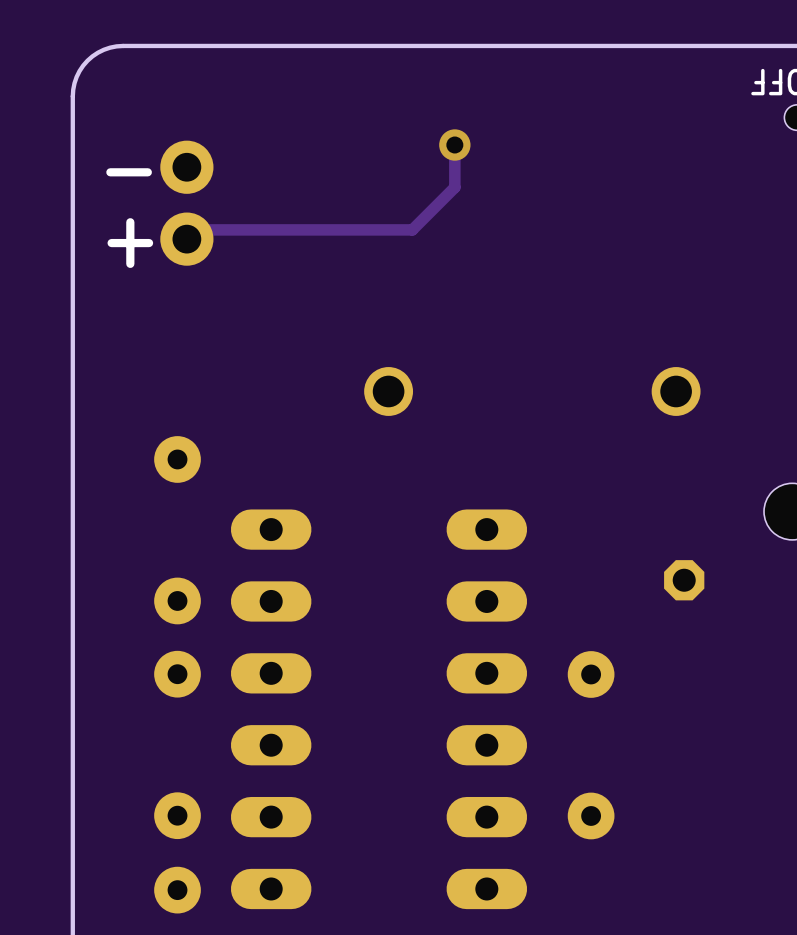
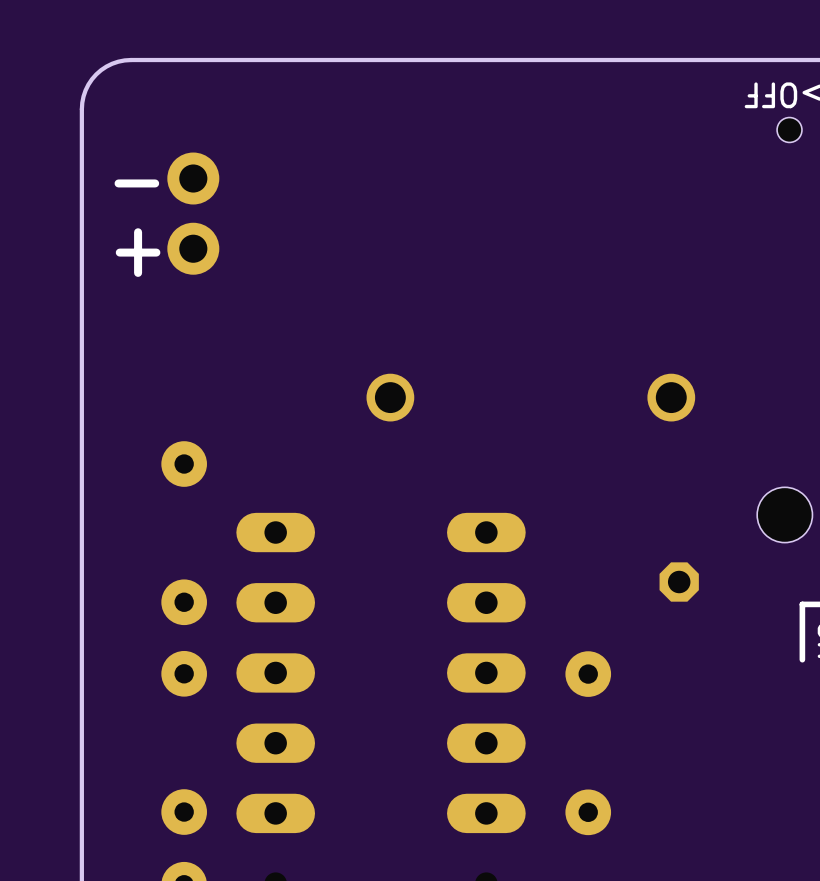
track: (454, 145) (454, 187) (412, 229) (196, 229) (186, 239) -> none
via: (454, 145) -> none

